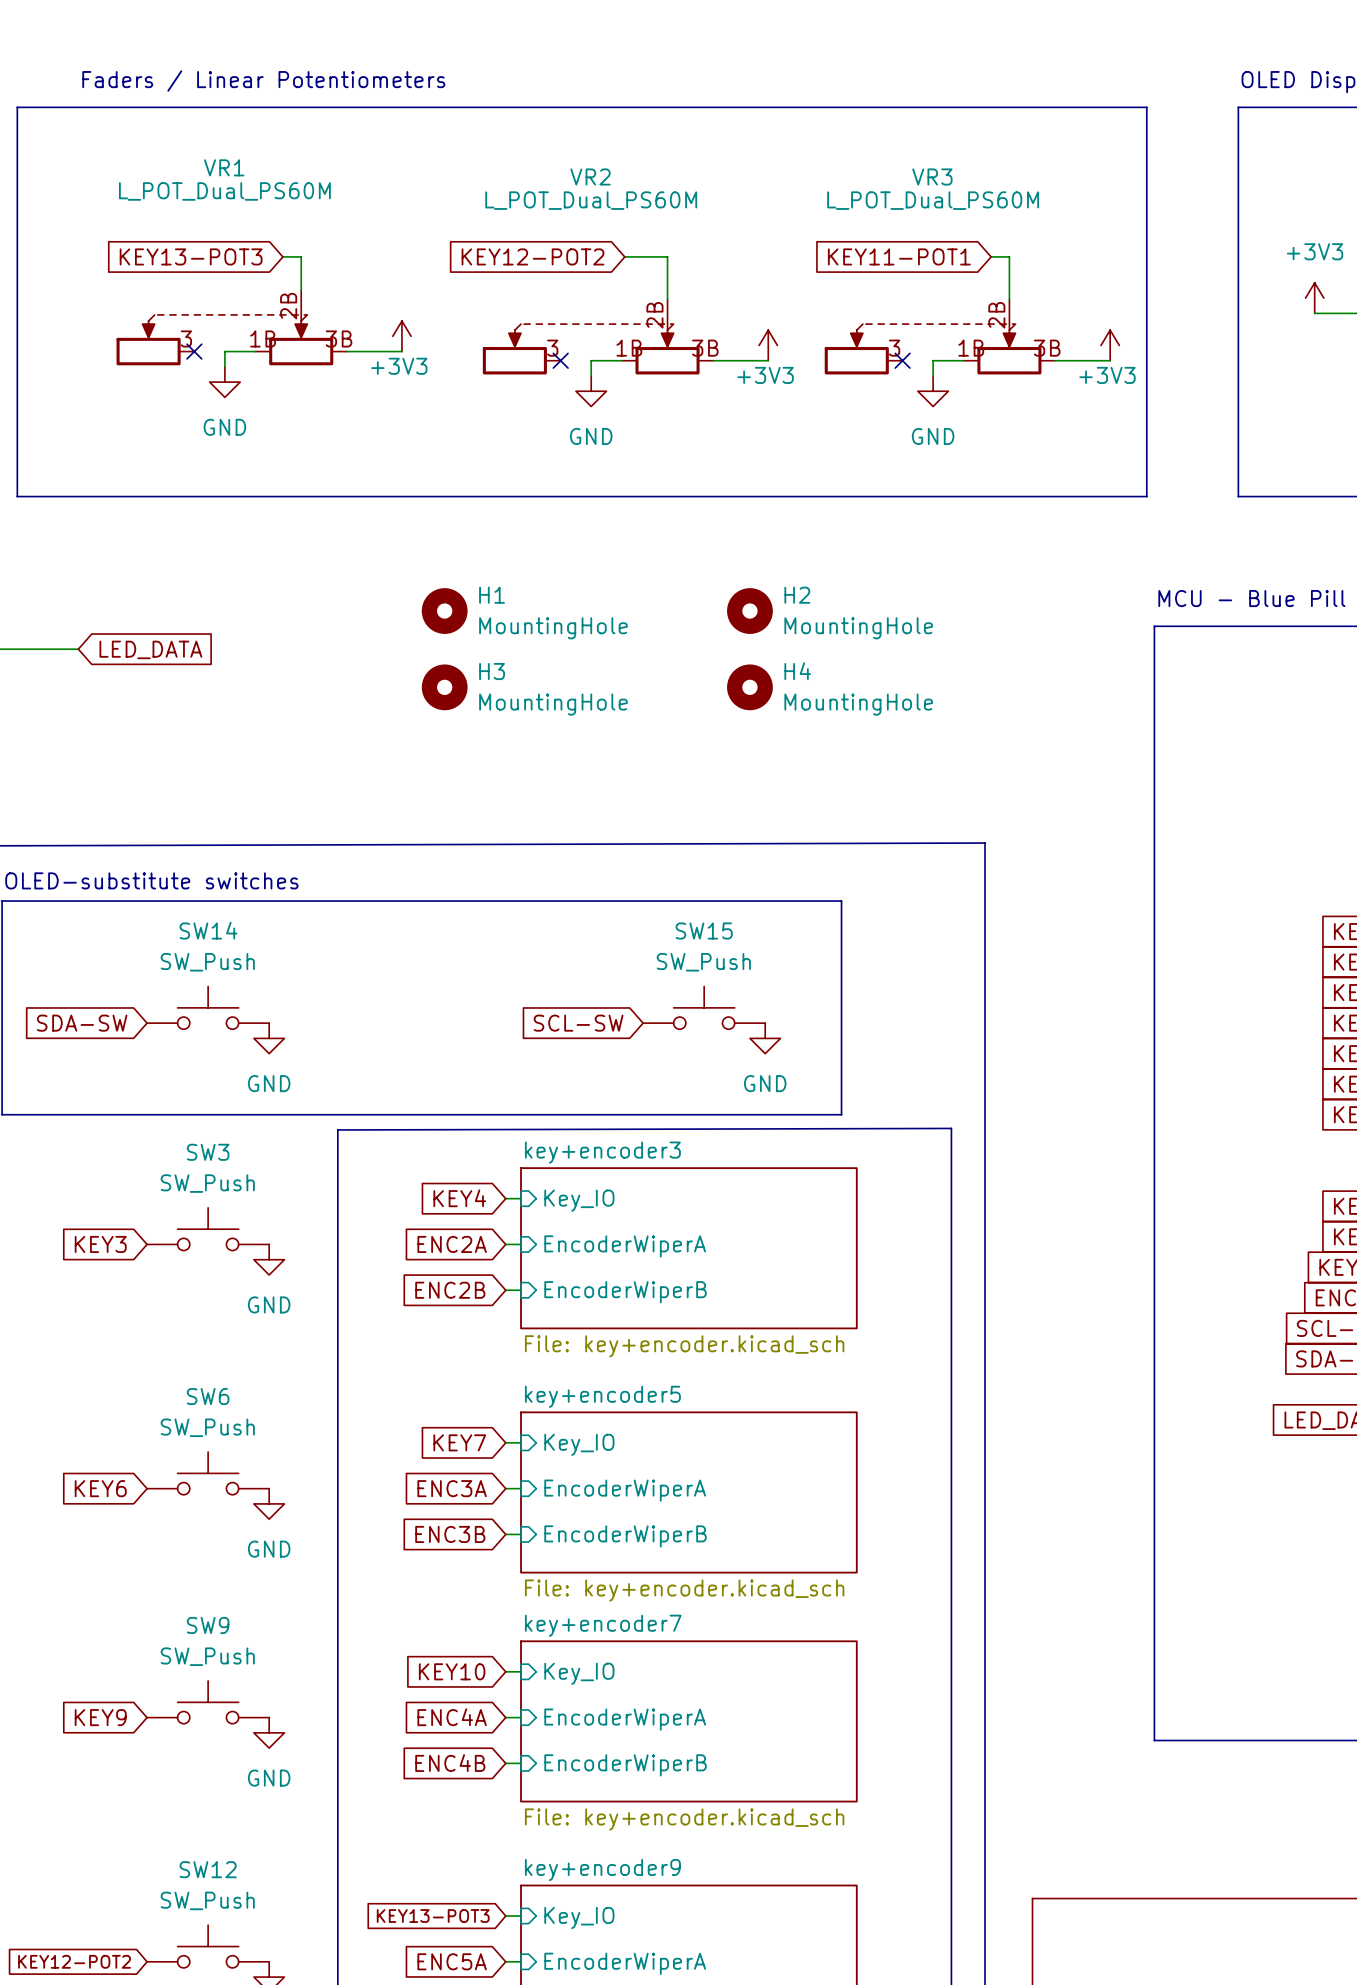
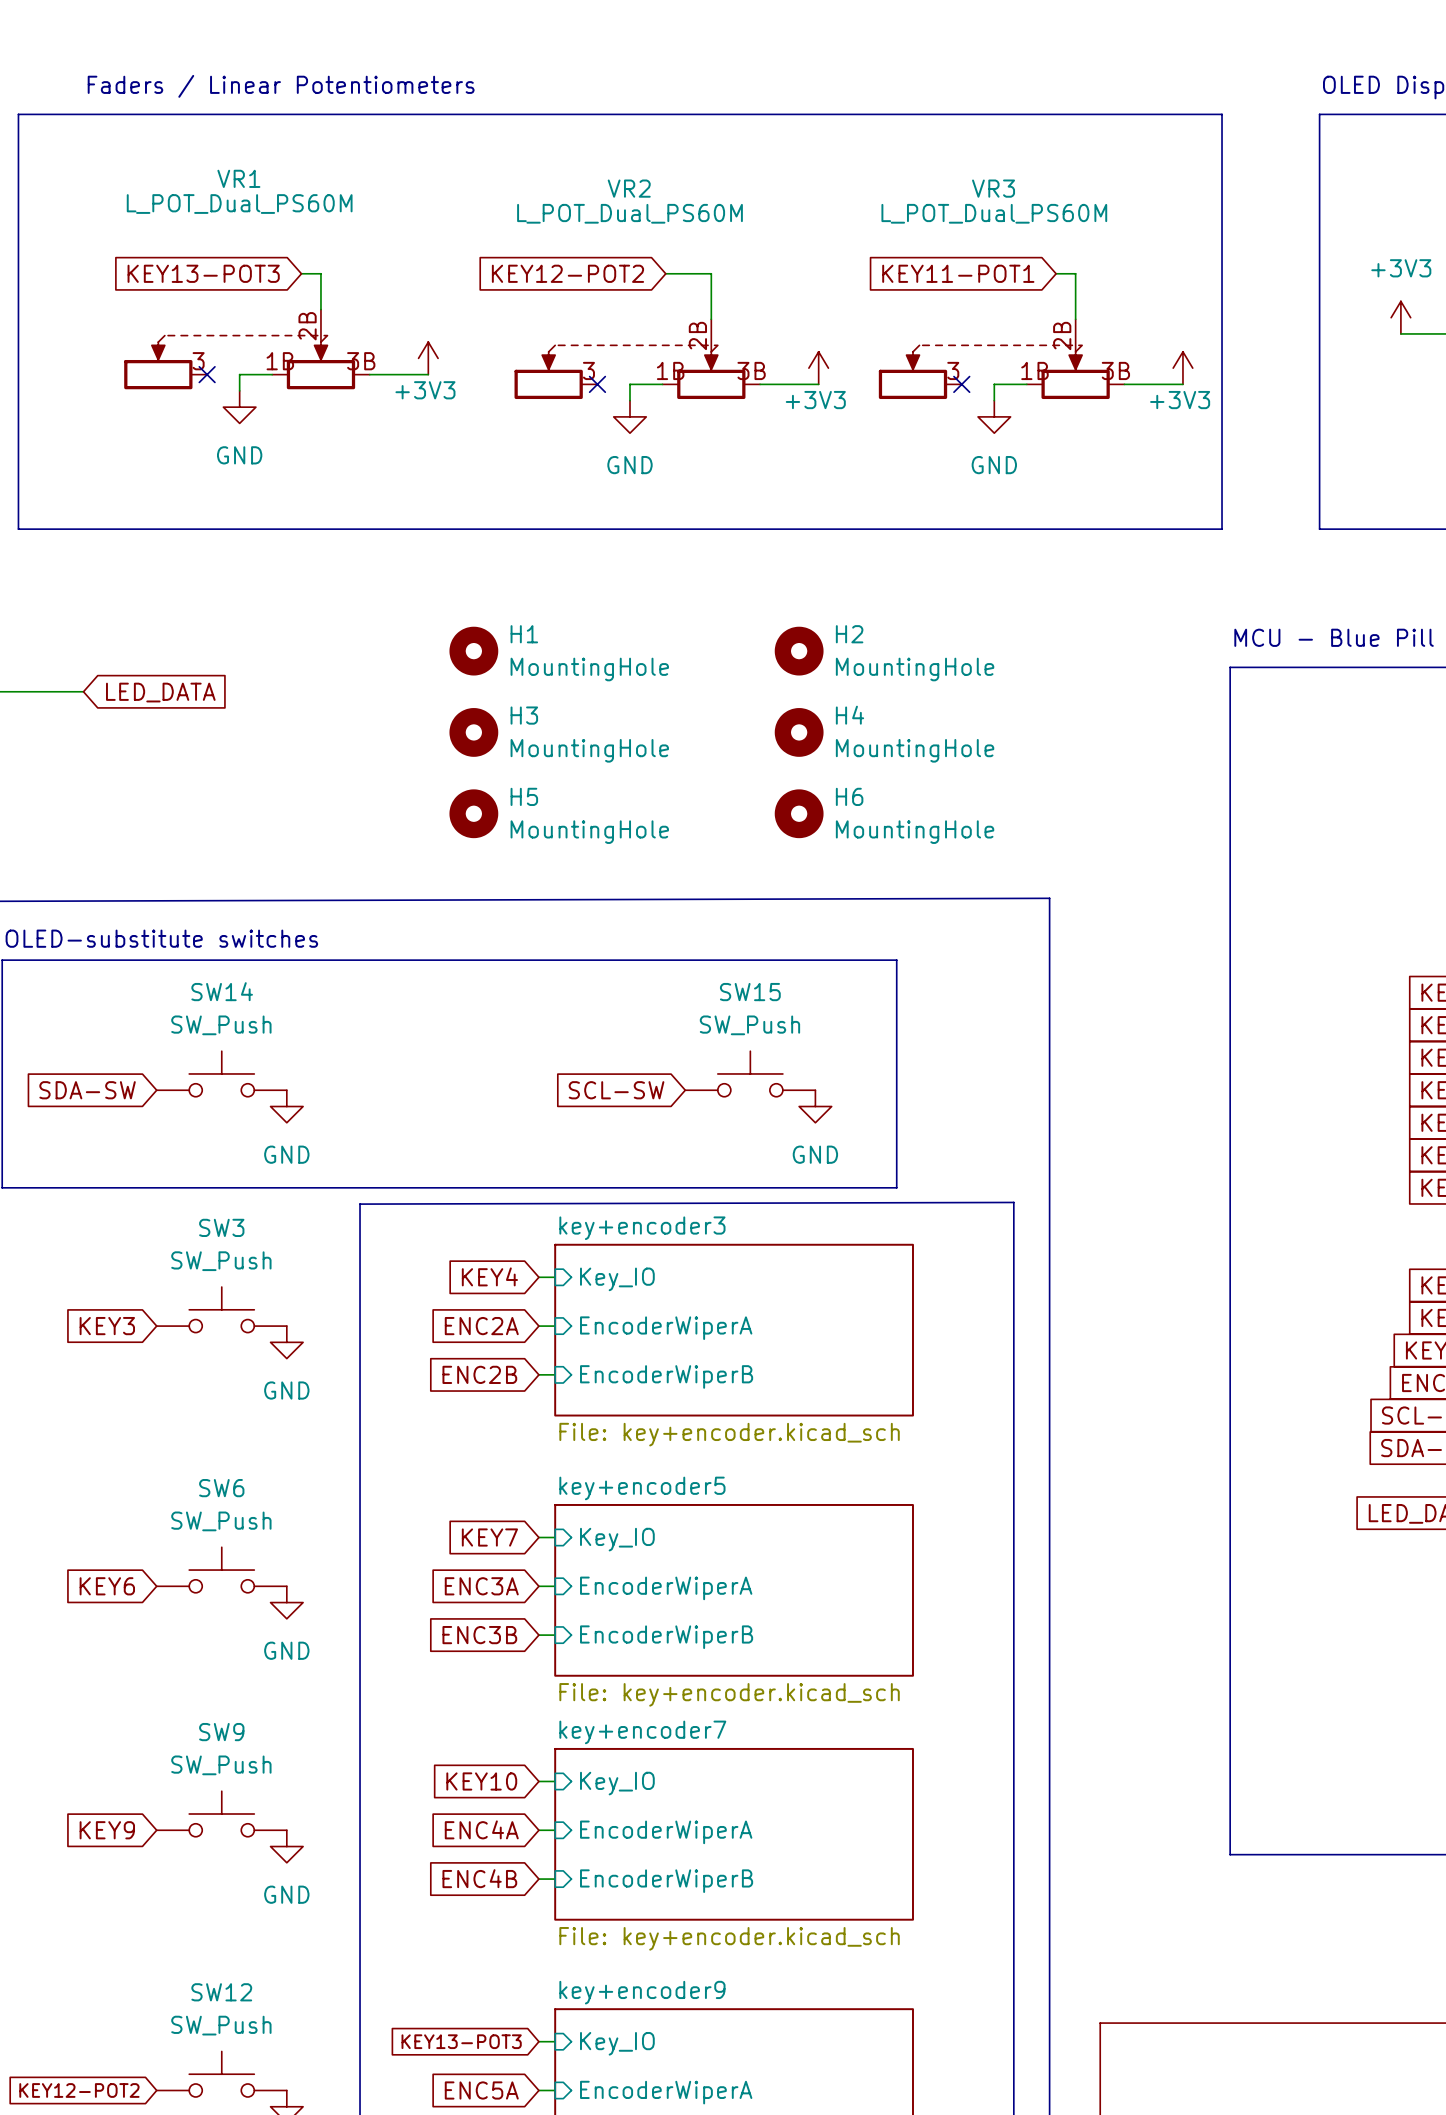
H5: none -> MountingHole (473, 813)
H6: none -> MountingHole (799, 813)

